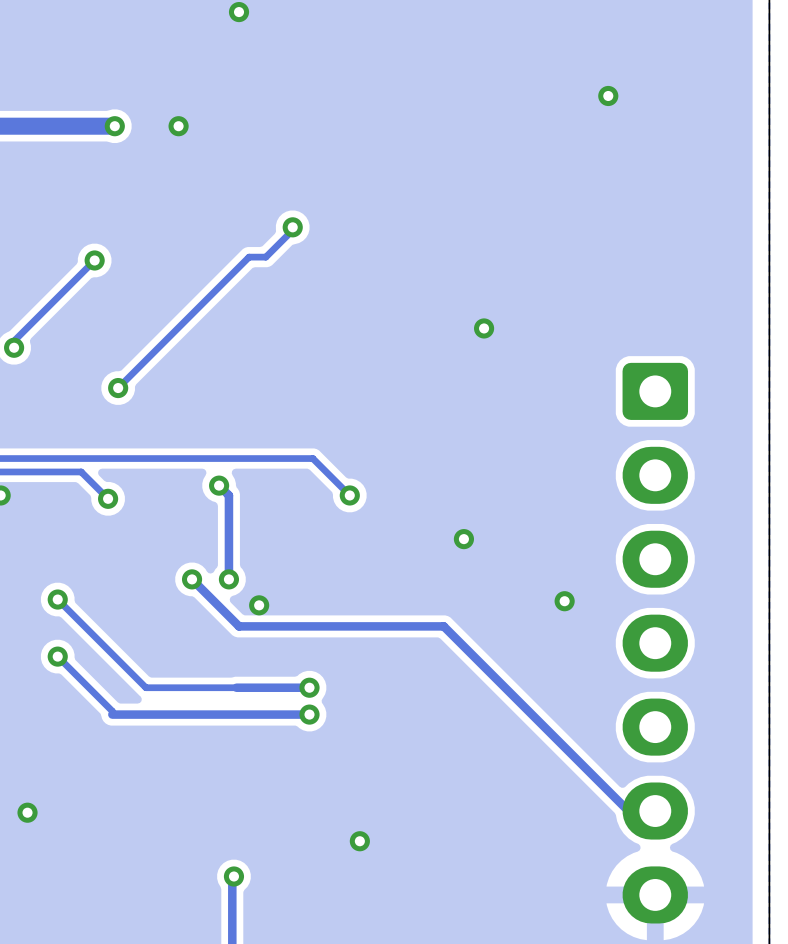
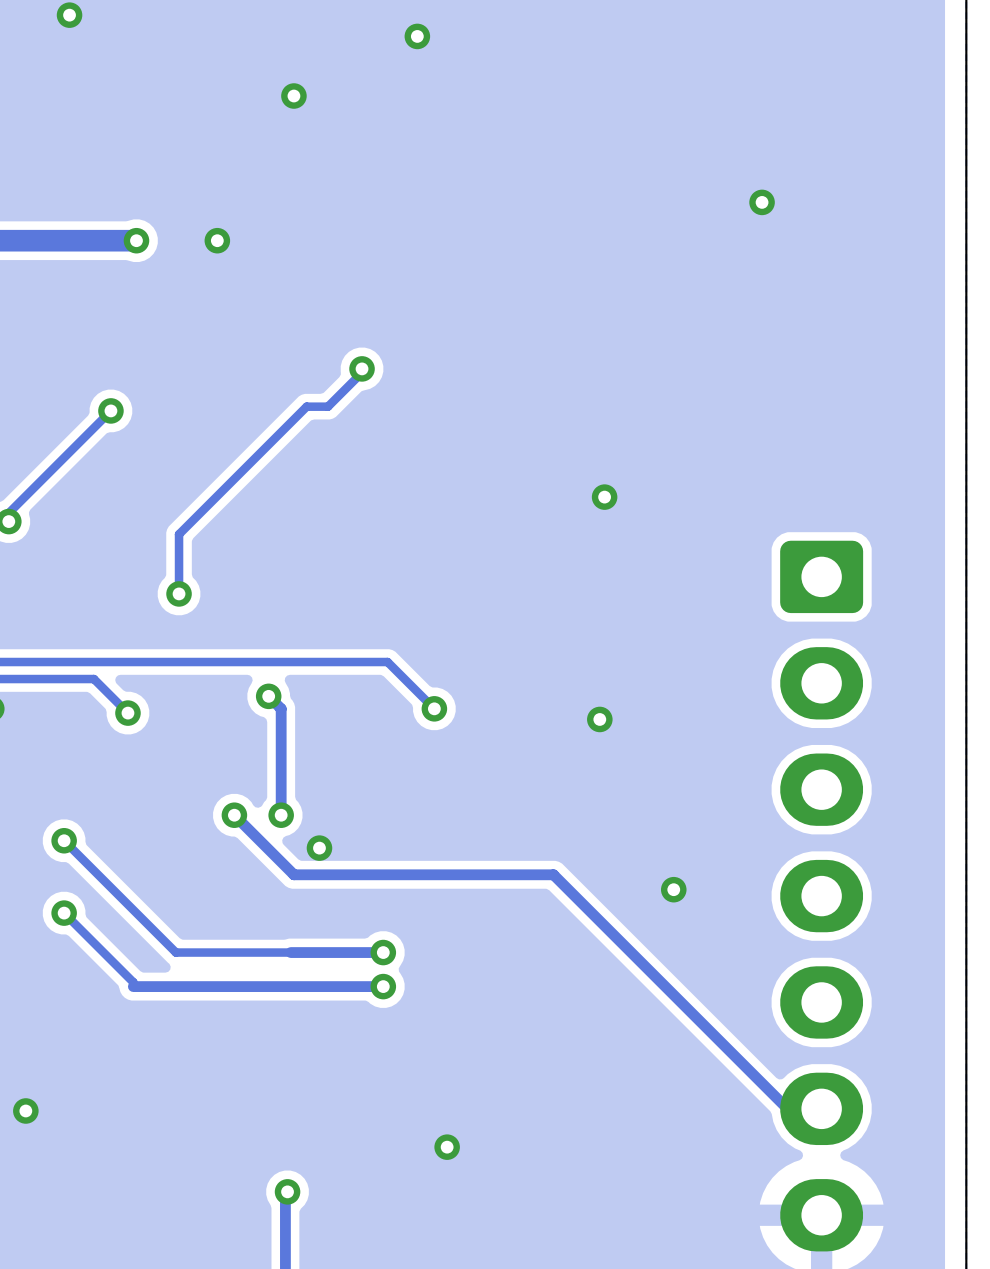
track: (148, 357) (118, 388) -> (179, 534) (179, 593)
via position: (118, 388) -> (179, 593)
via position: (463, 539) -> (599, 719)
via position: (564, 601) -> (673, 889)

